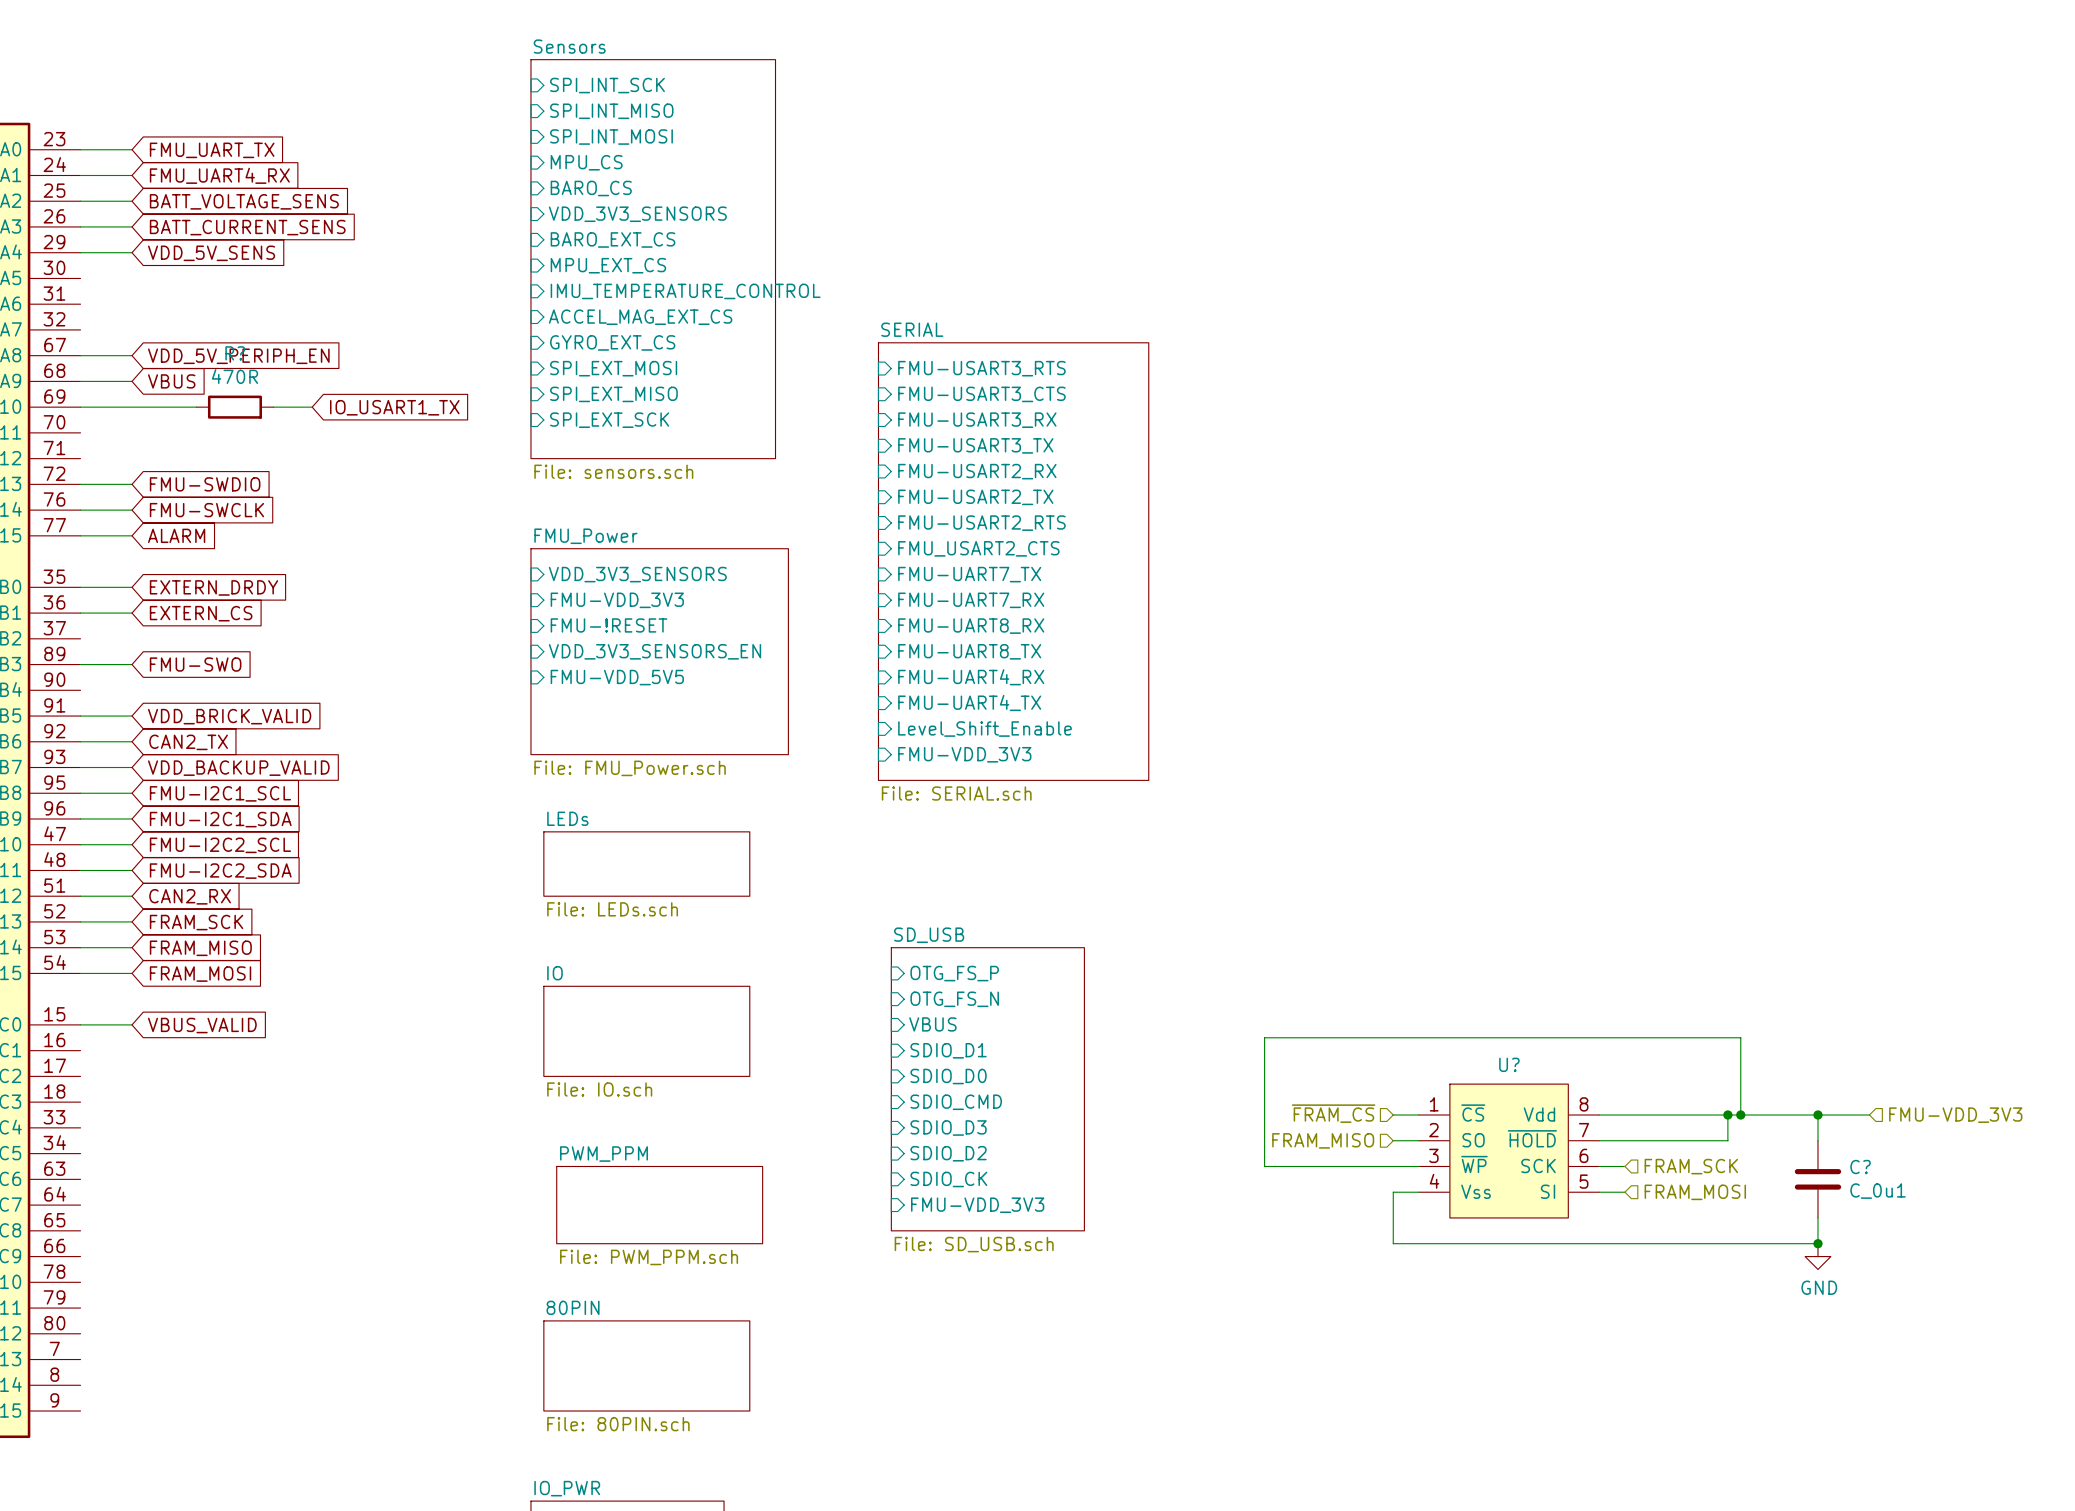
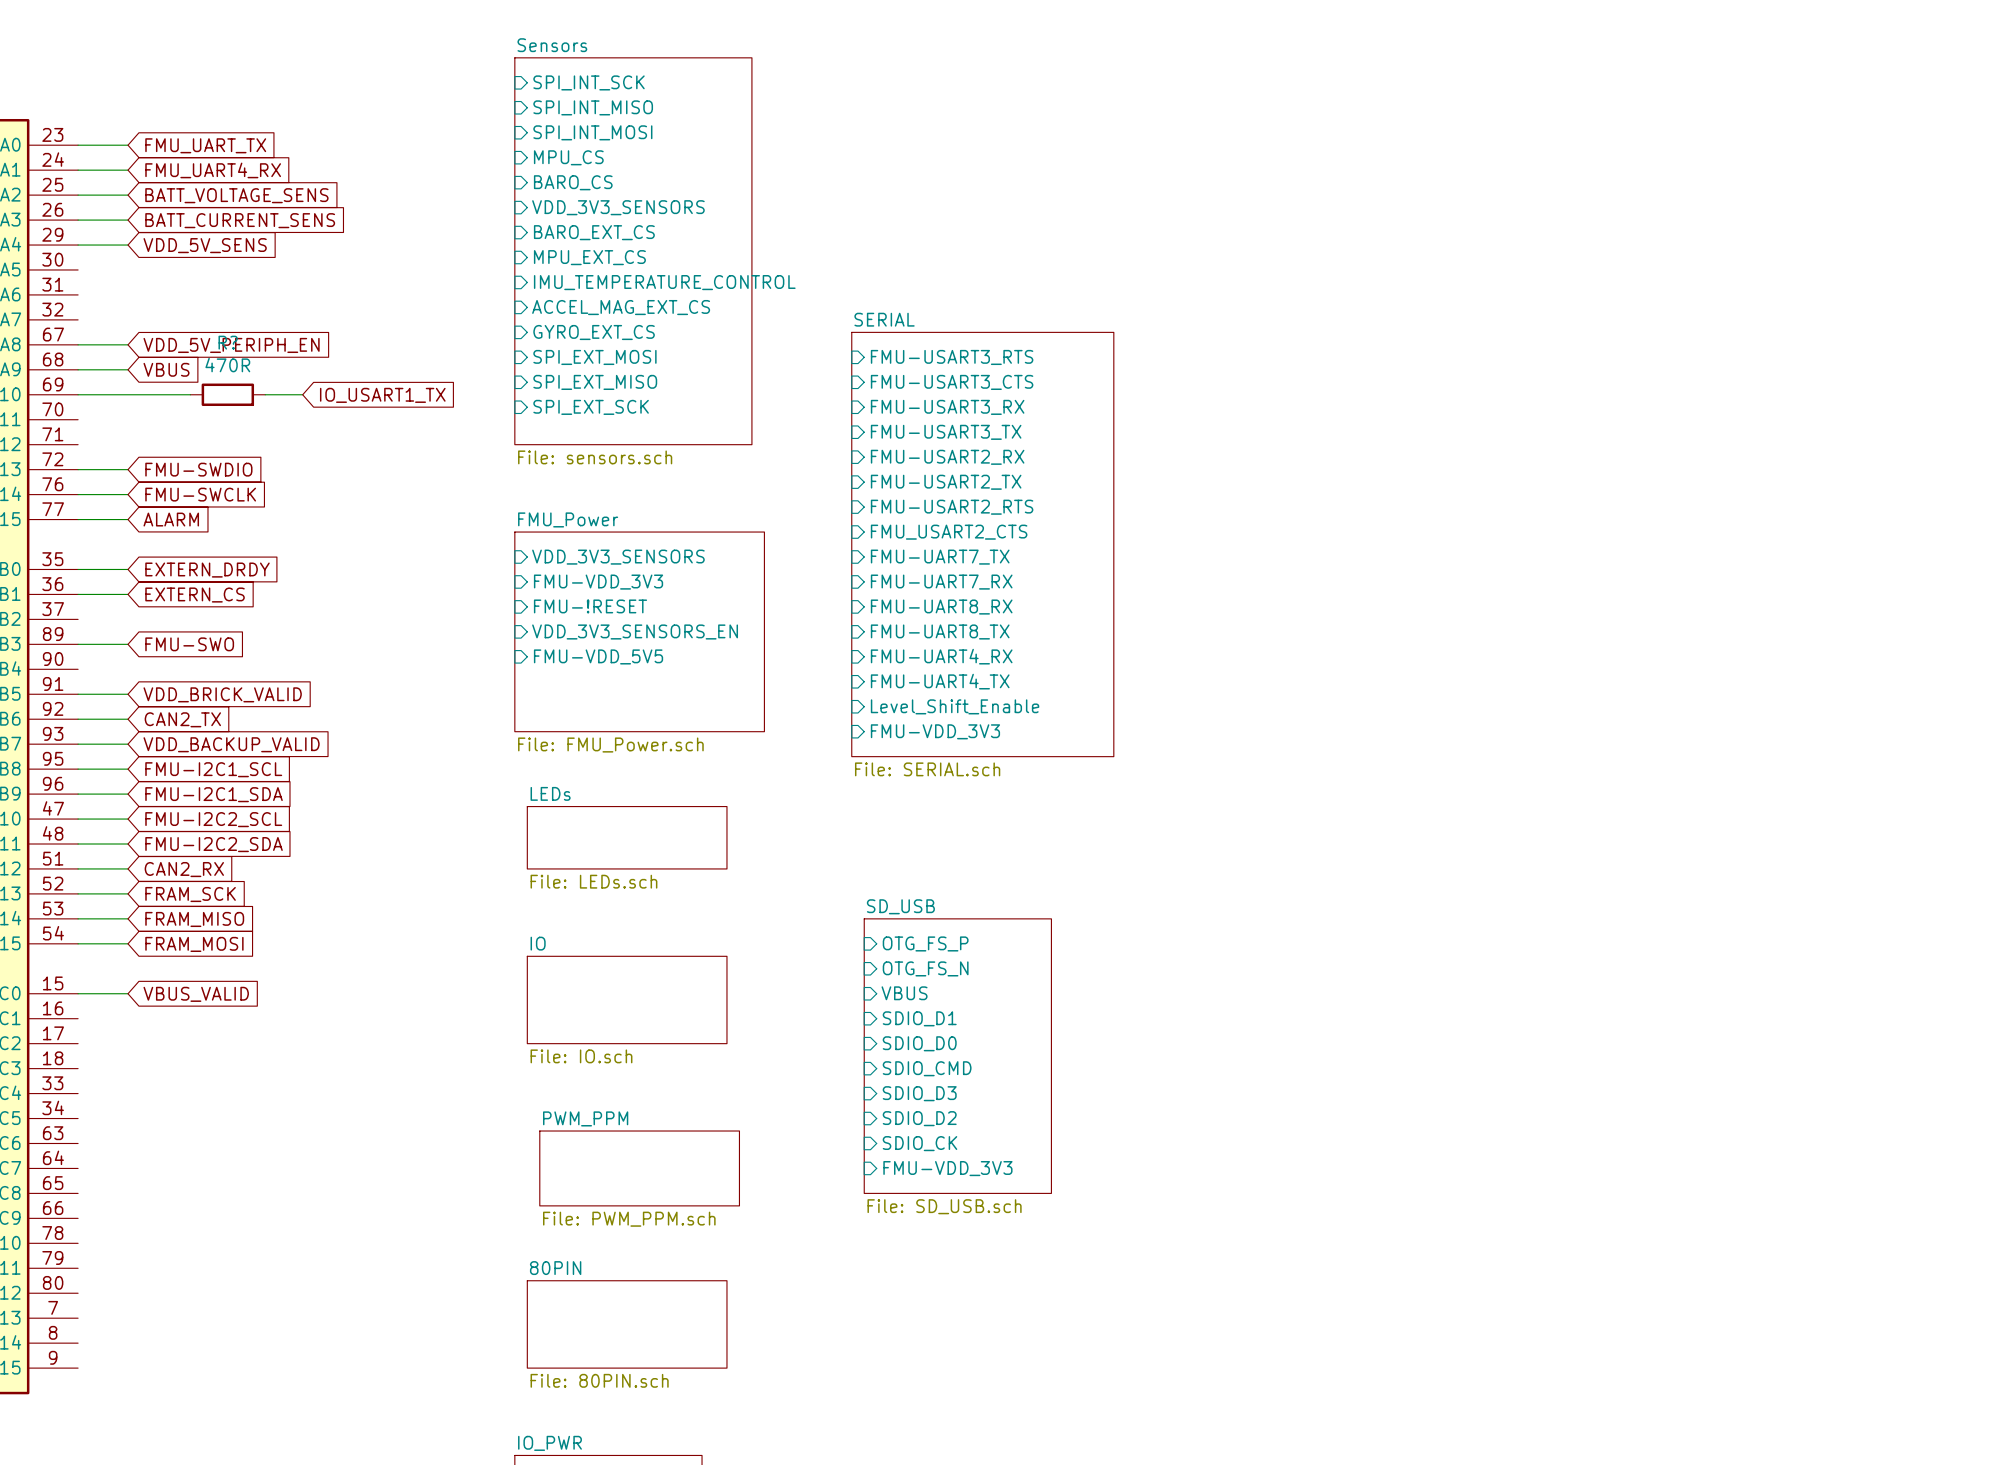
hierarchical label: ~{FRAM_CS} (1333, 1113) -> none
wire: (1393, 1115) (1419, 1115) -> none
wire: (1599, 1115) (1869, 1115) -> none
wire: (1727, 1115) (1727, 1140) (1599, 1140) -> none
junction: (1727, 1115) -> none
wire: (1740, 1115) (1740, 1037) (1264, 1037) (1264, 1166) (1419, 1166) -> none
junction: (1740, 1115) -> none
wire: (1817, 1115) (1817, 1140) -> none
junction: (1817, 1115) -> none
hierarchical label: FMU-VDD_3V3 (1955, 1115) -> none
hierarchical label: FRAM_MISO (1323, 1140) -> none
wire: (1393, 1140) (1419, 1140) -> none
U?: (1509, 1151) -> none
wire: (1599, 1166) (1624, 1166) -> none
hierarchical label: FRAM_SCK (1691, 1166) -> none
C?: C_0u1 (1817, 1179) -> none
wire: (1419, 1192) (1393, 1192) (1393, 1243) (1817, 1243) (1817, 1217) -> none
wire: (1599, 1192) (1624, 1192) -> none
hierarchical label: FRAM_MOSI (1695, 1192) -> none
junction: (1817, 1243) -> none
power symbol: GND (1817, 1256) -> none

